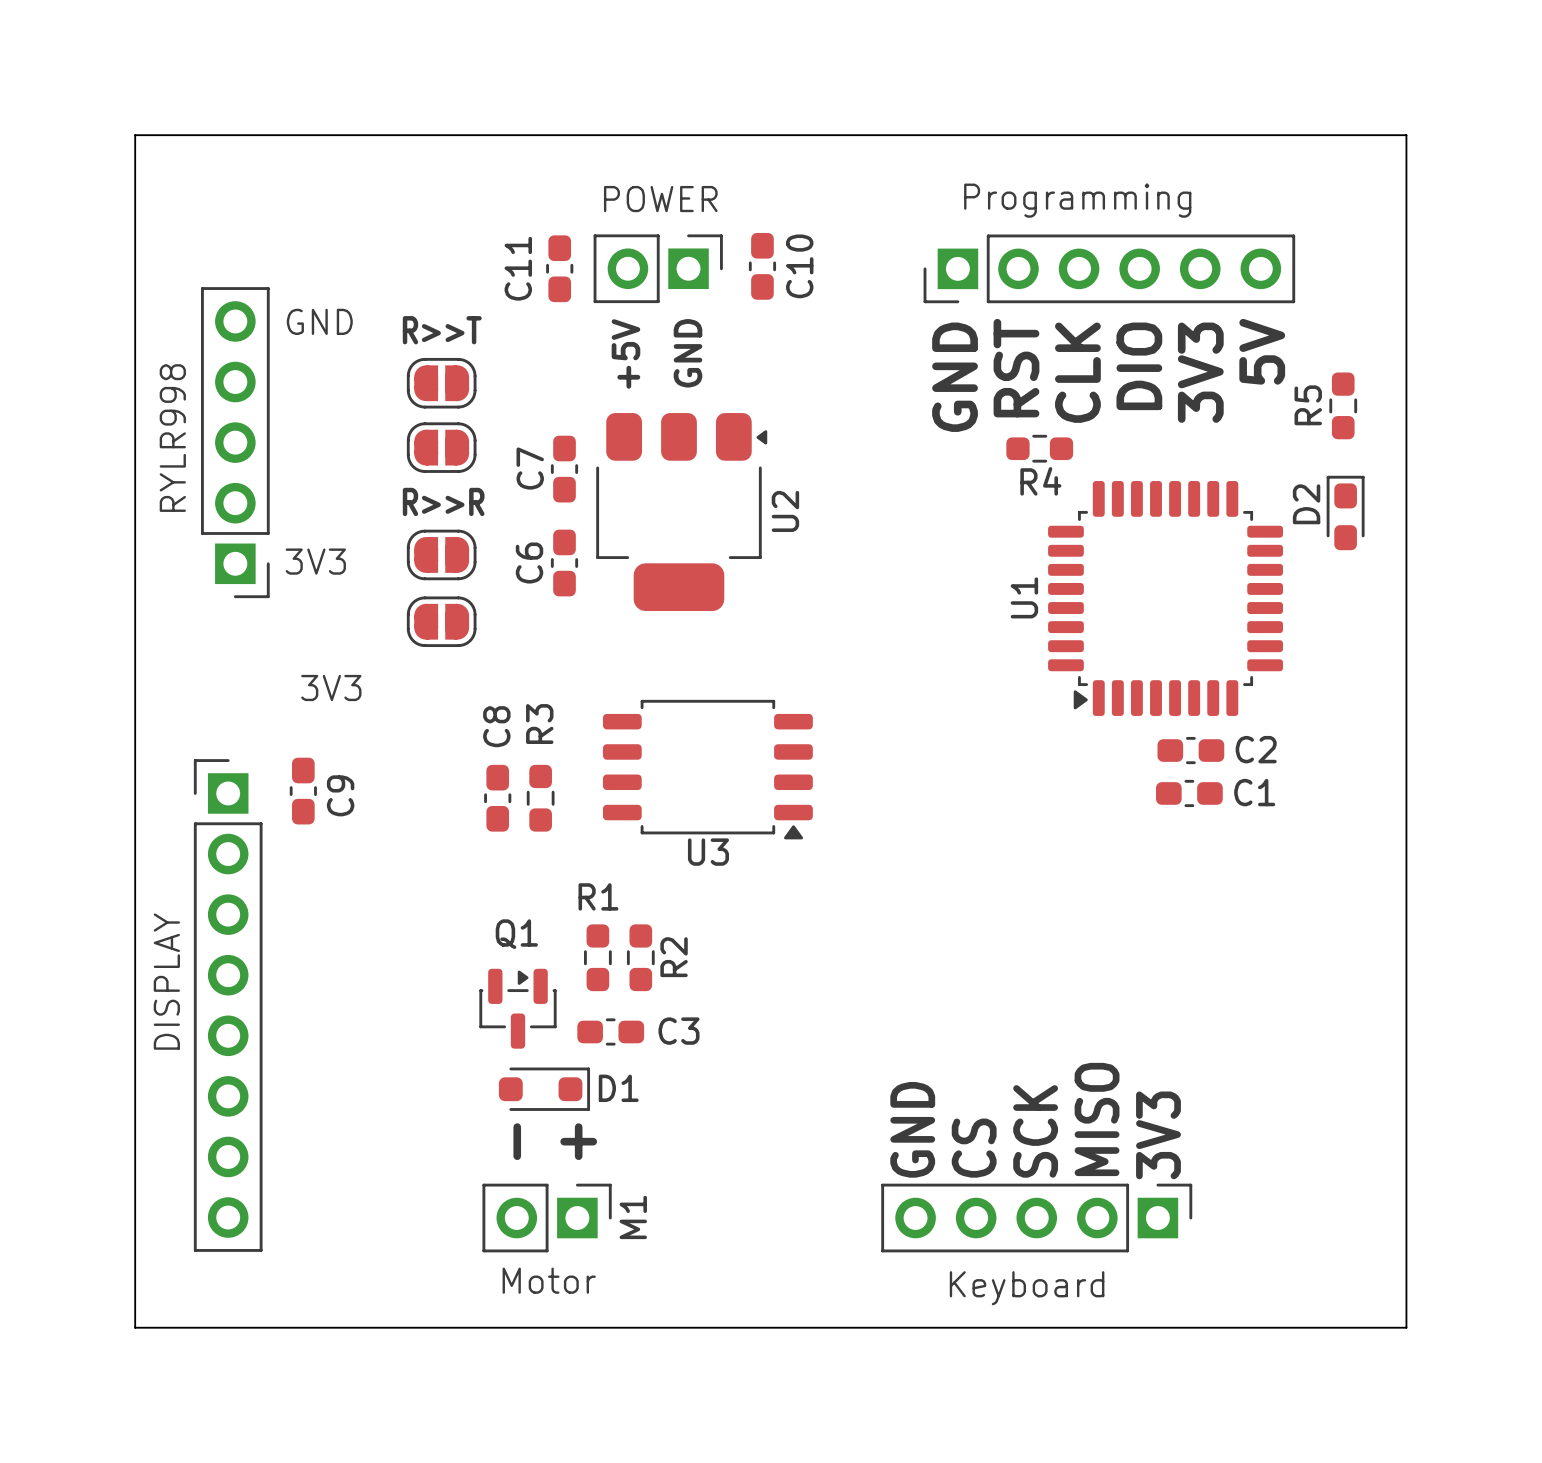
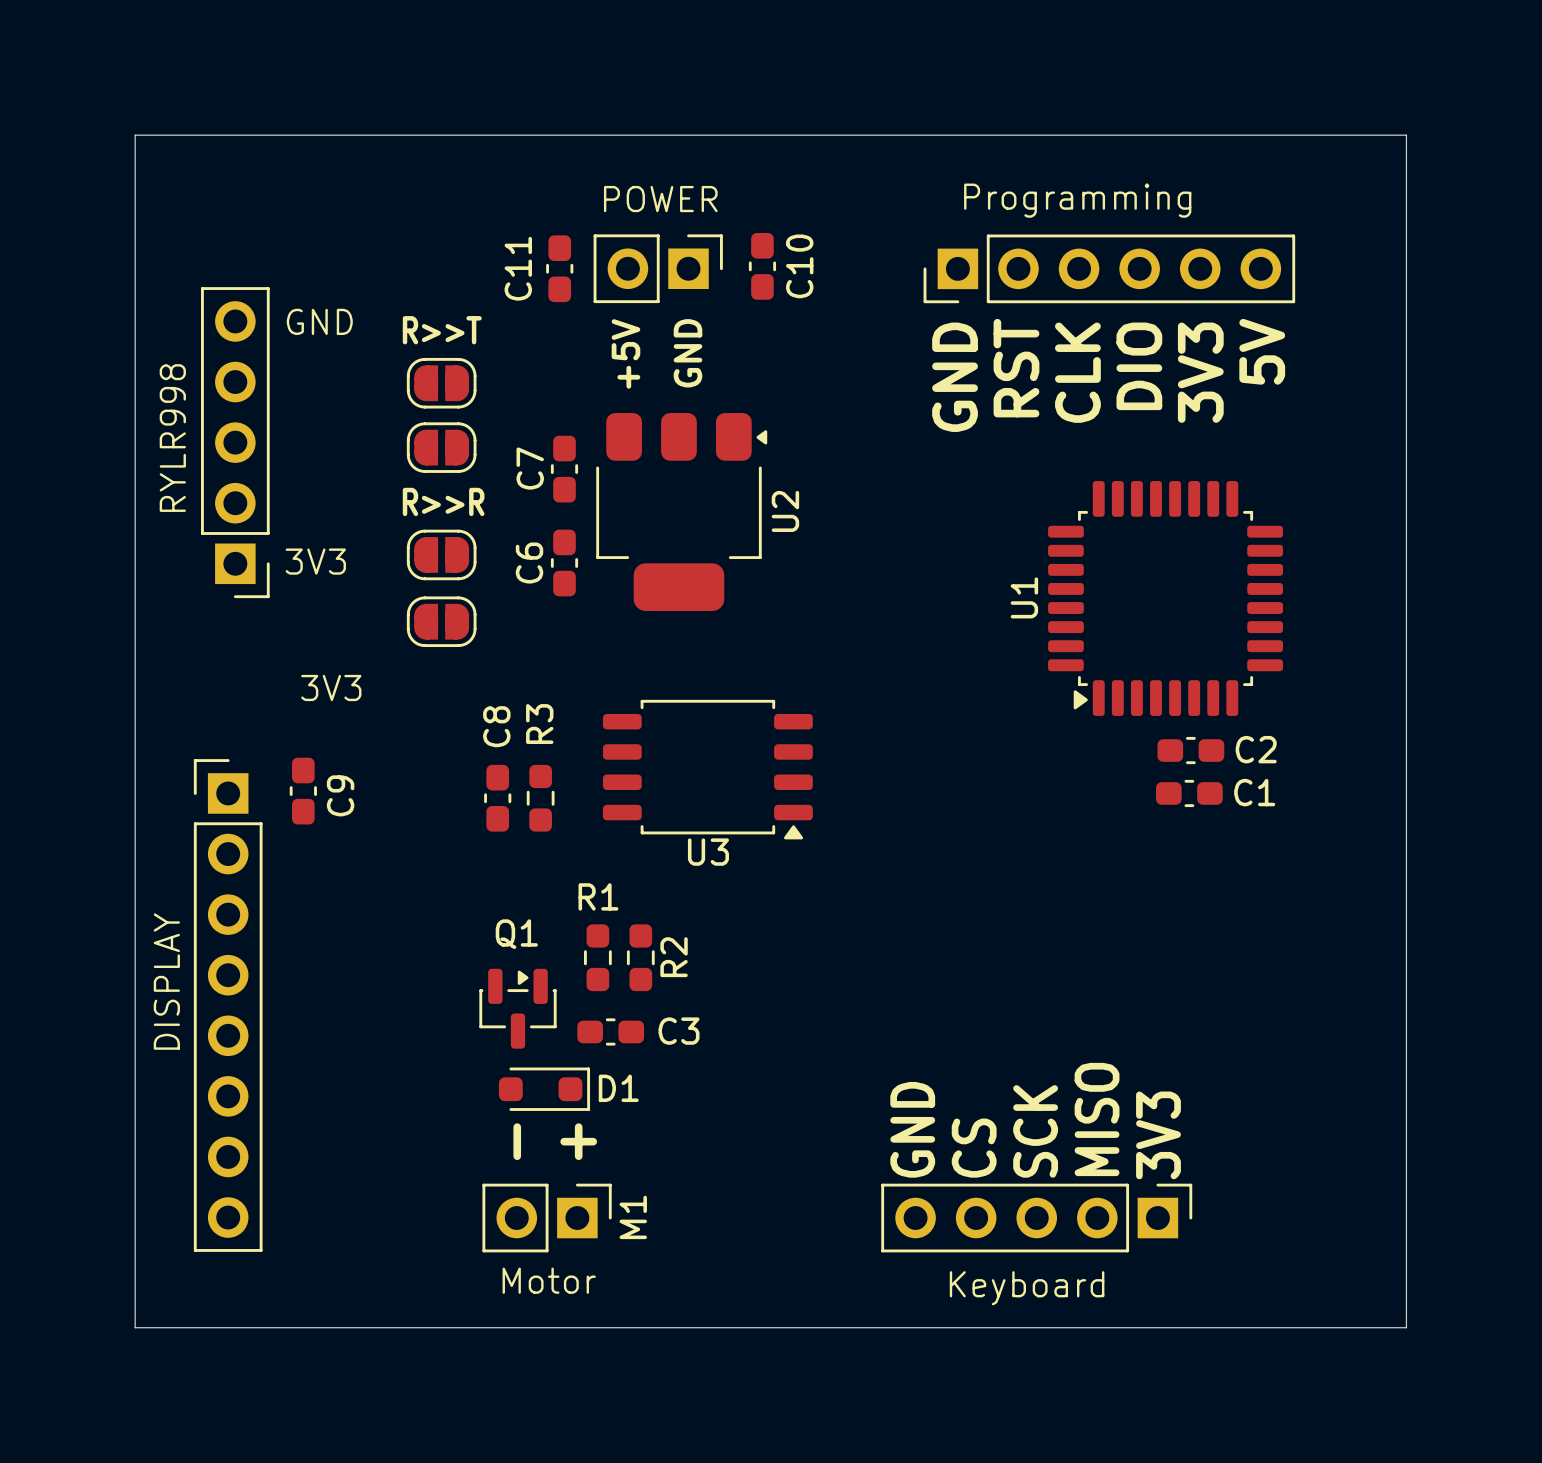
R5: (1343, 405) -> none
R4: (1039, 448) -> none
D2: (1345, 512) -> none

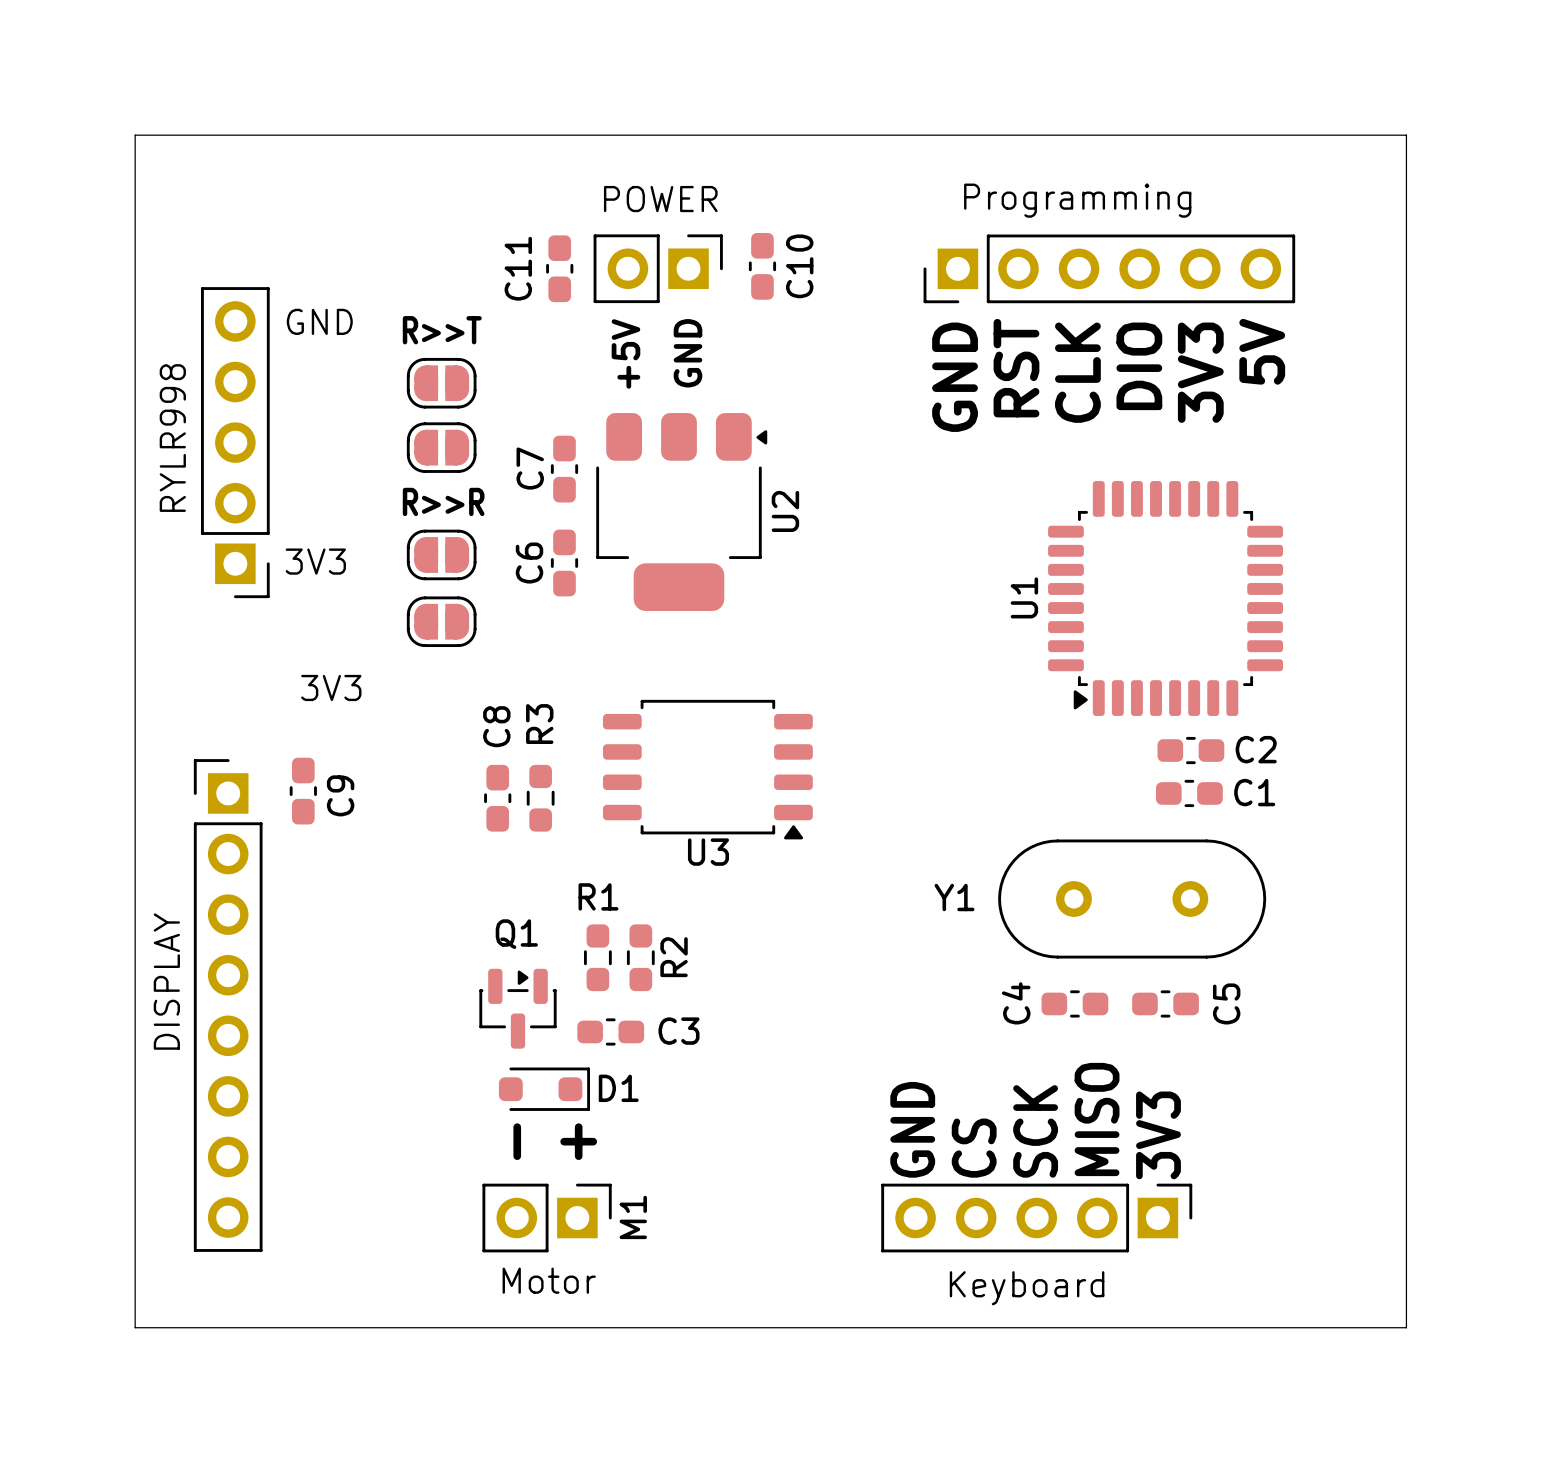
Y1: none -> (1132, 899)
C4: none -> (1074, 1003)
C5: none -> (1165, 1003)

